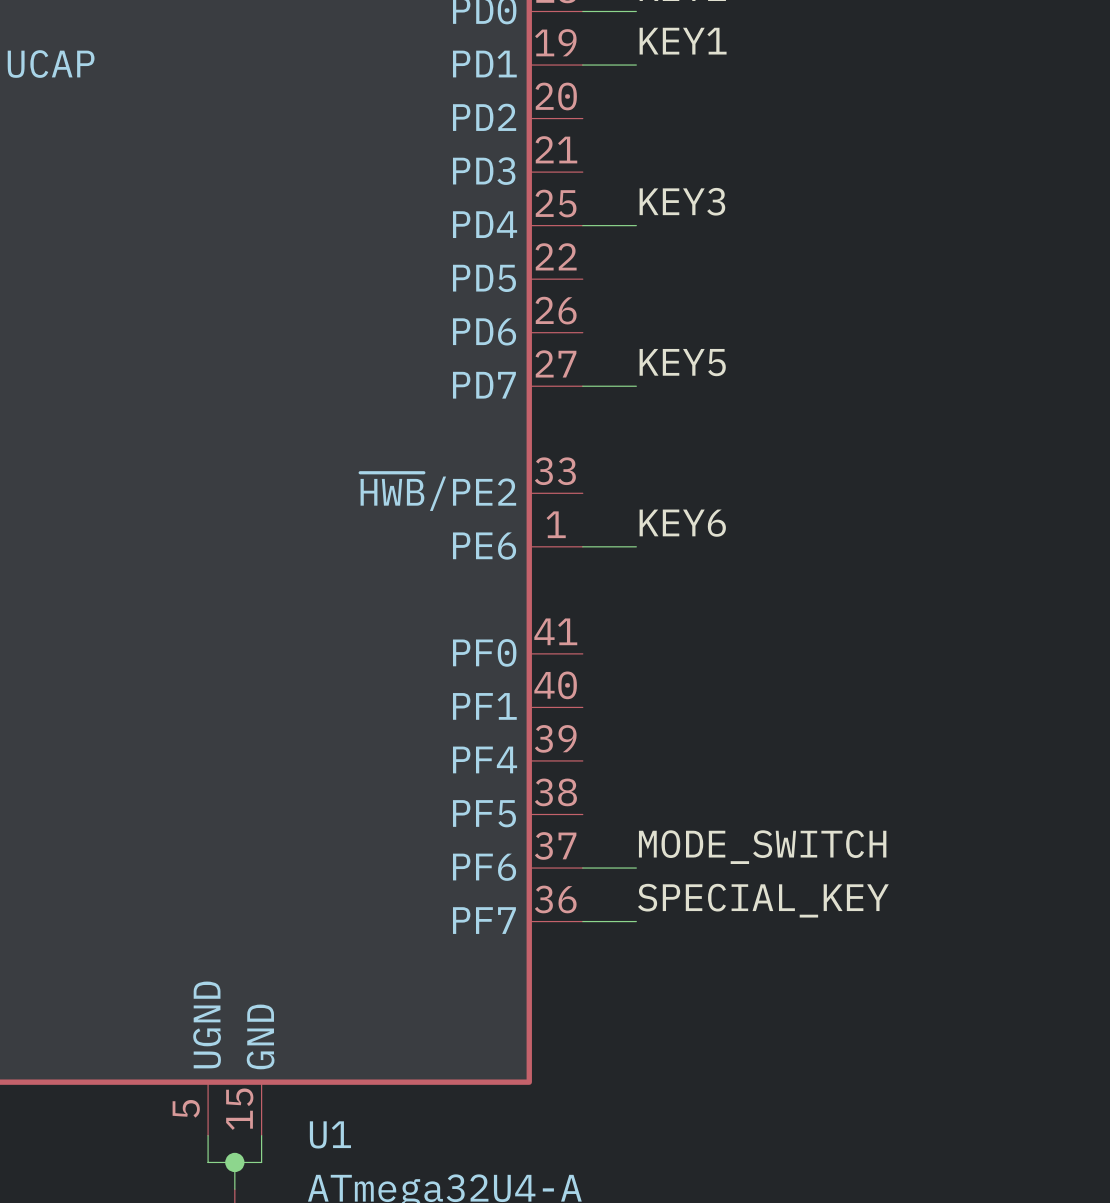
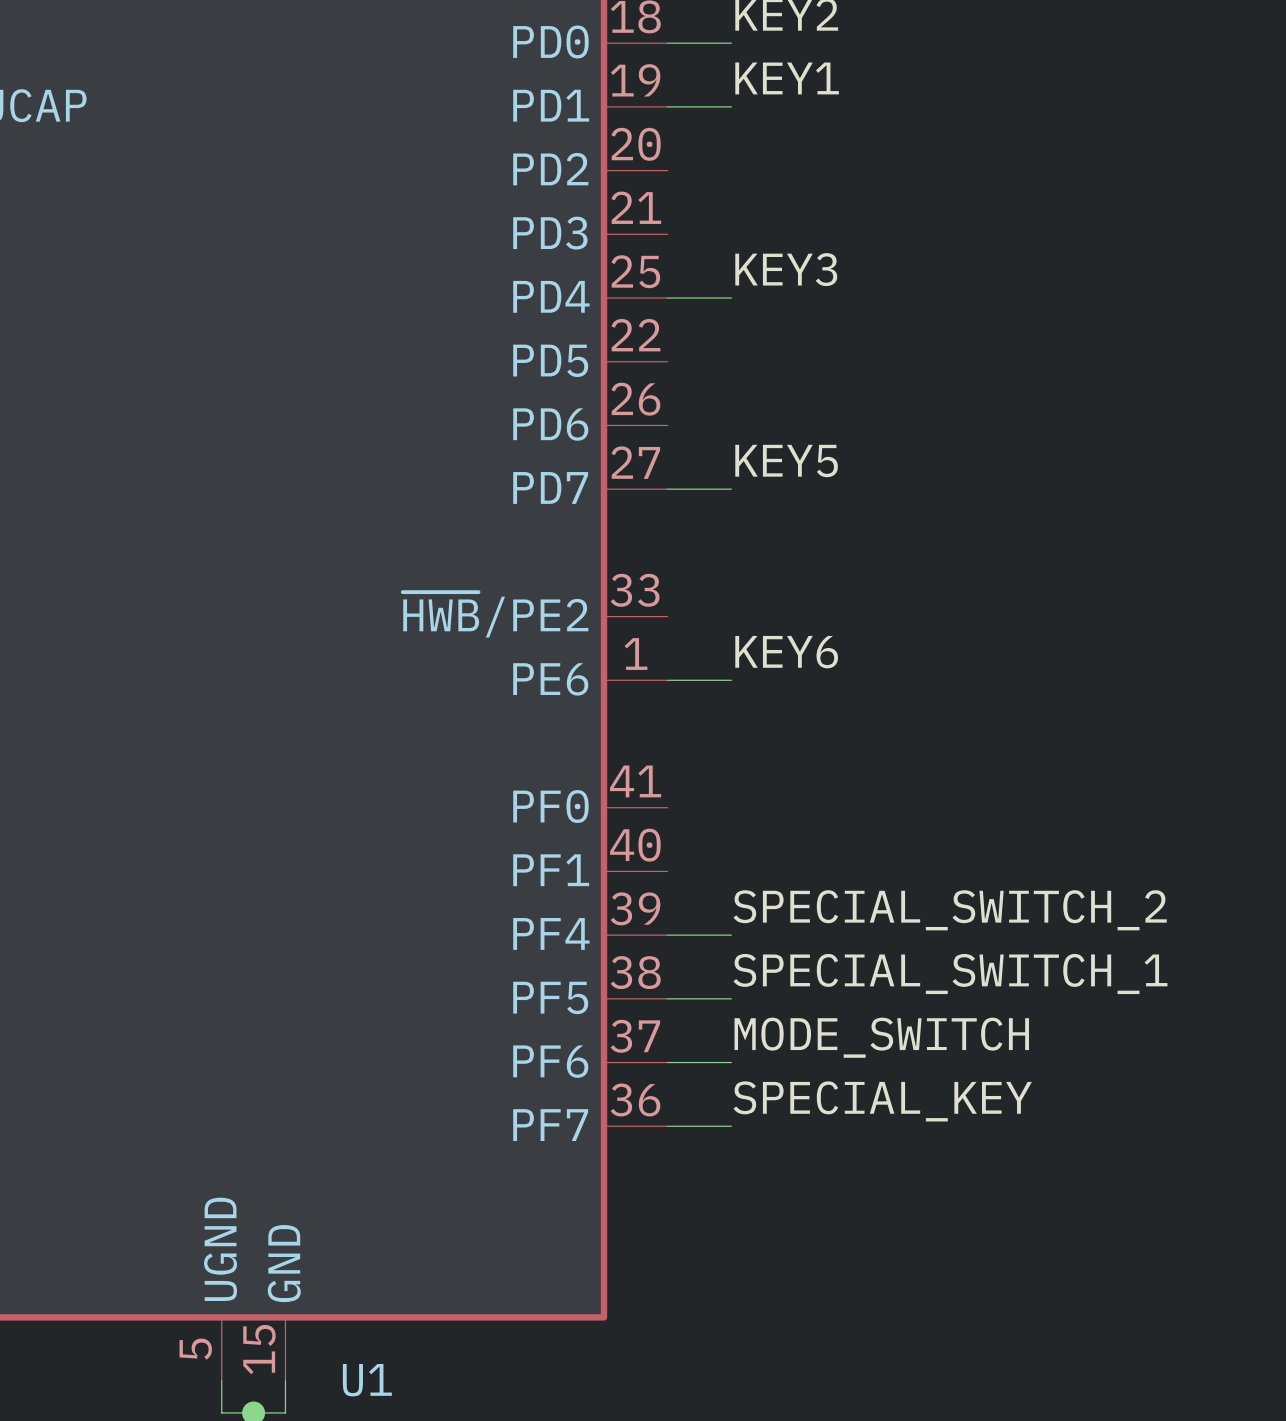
label: none -> SPECIAL_SWITCH_2 (950, 910)
wire: none -> (667, 935) (731, 935)
label: none -> SPECIAL_SWITCH_1 (950, 974)
wire: none -> (667, 998) (731, 998)

